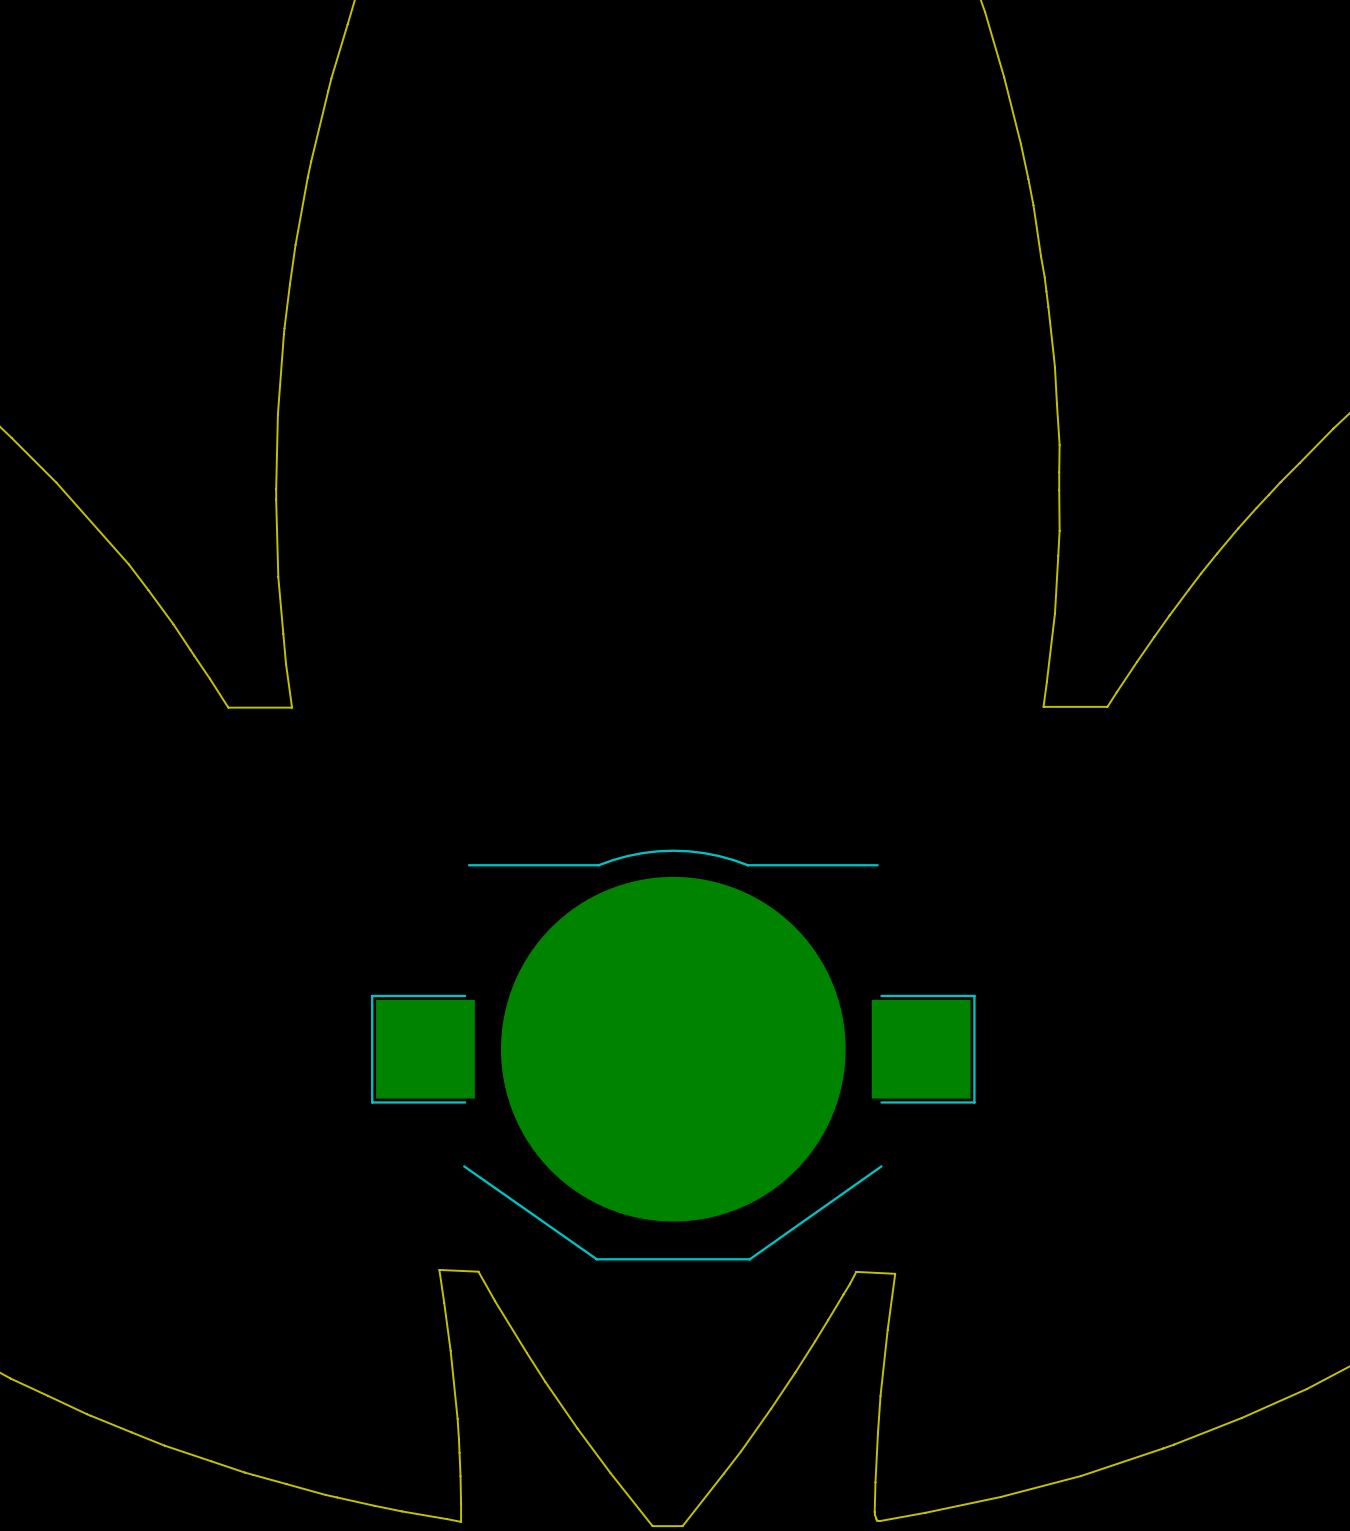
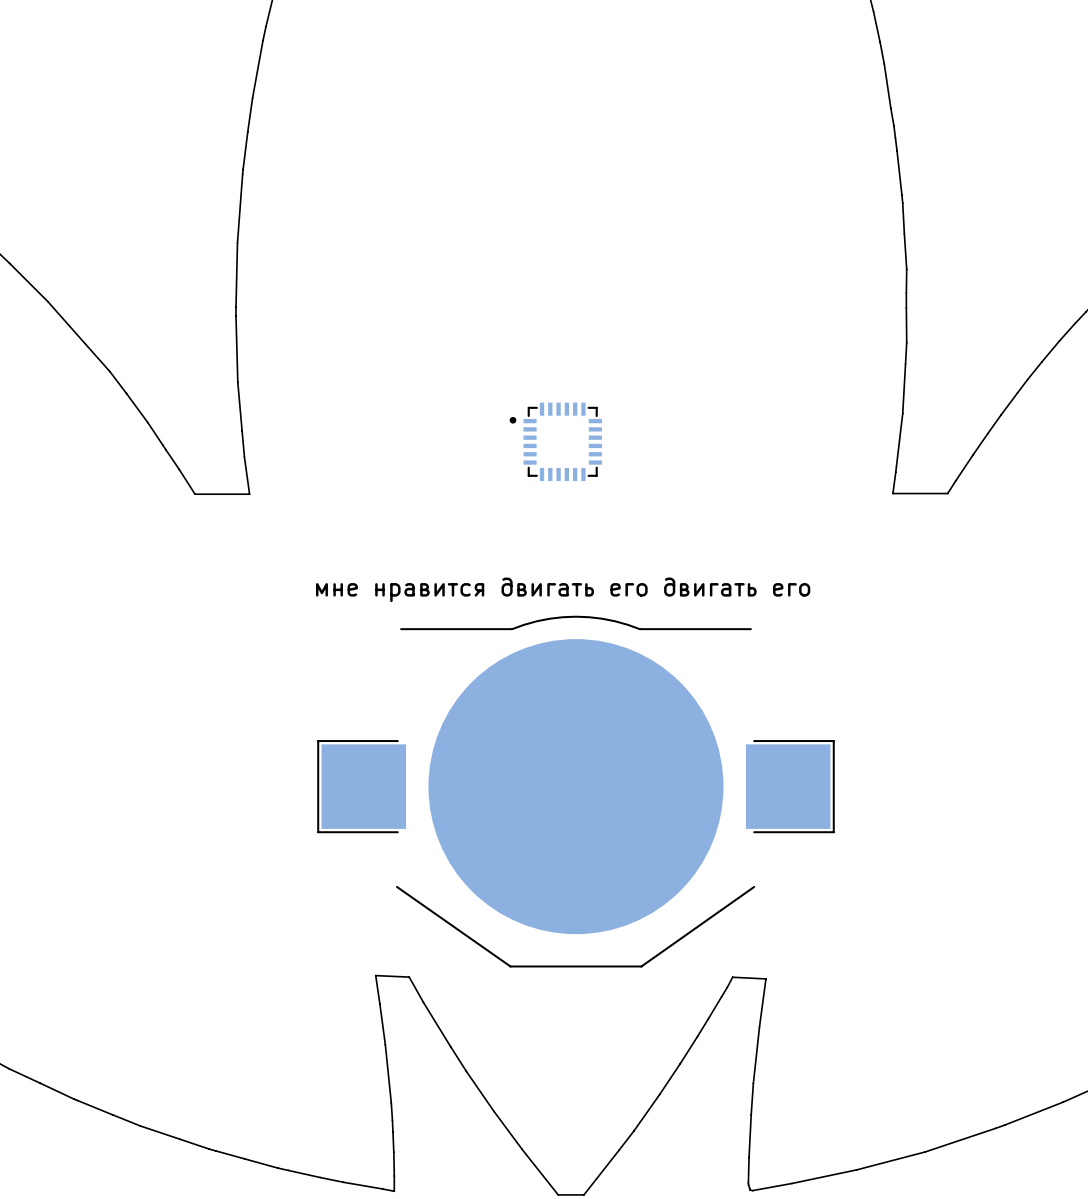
part: none -> (555, 441)
text: none -> мне нравится двигать его двигать его (563, 589)

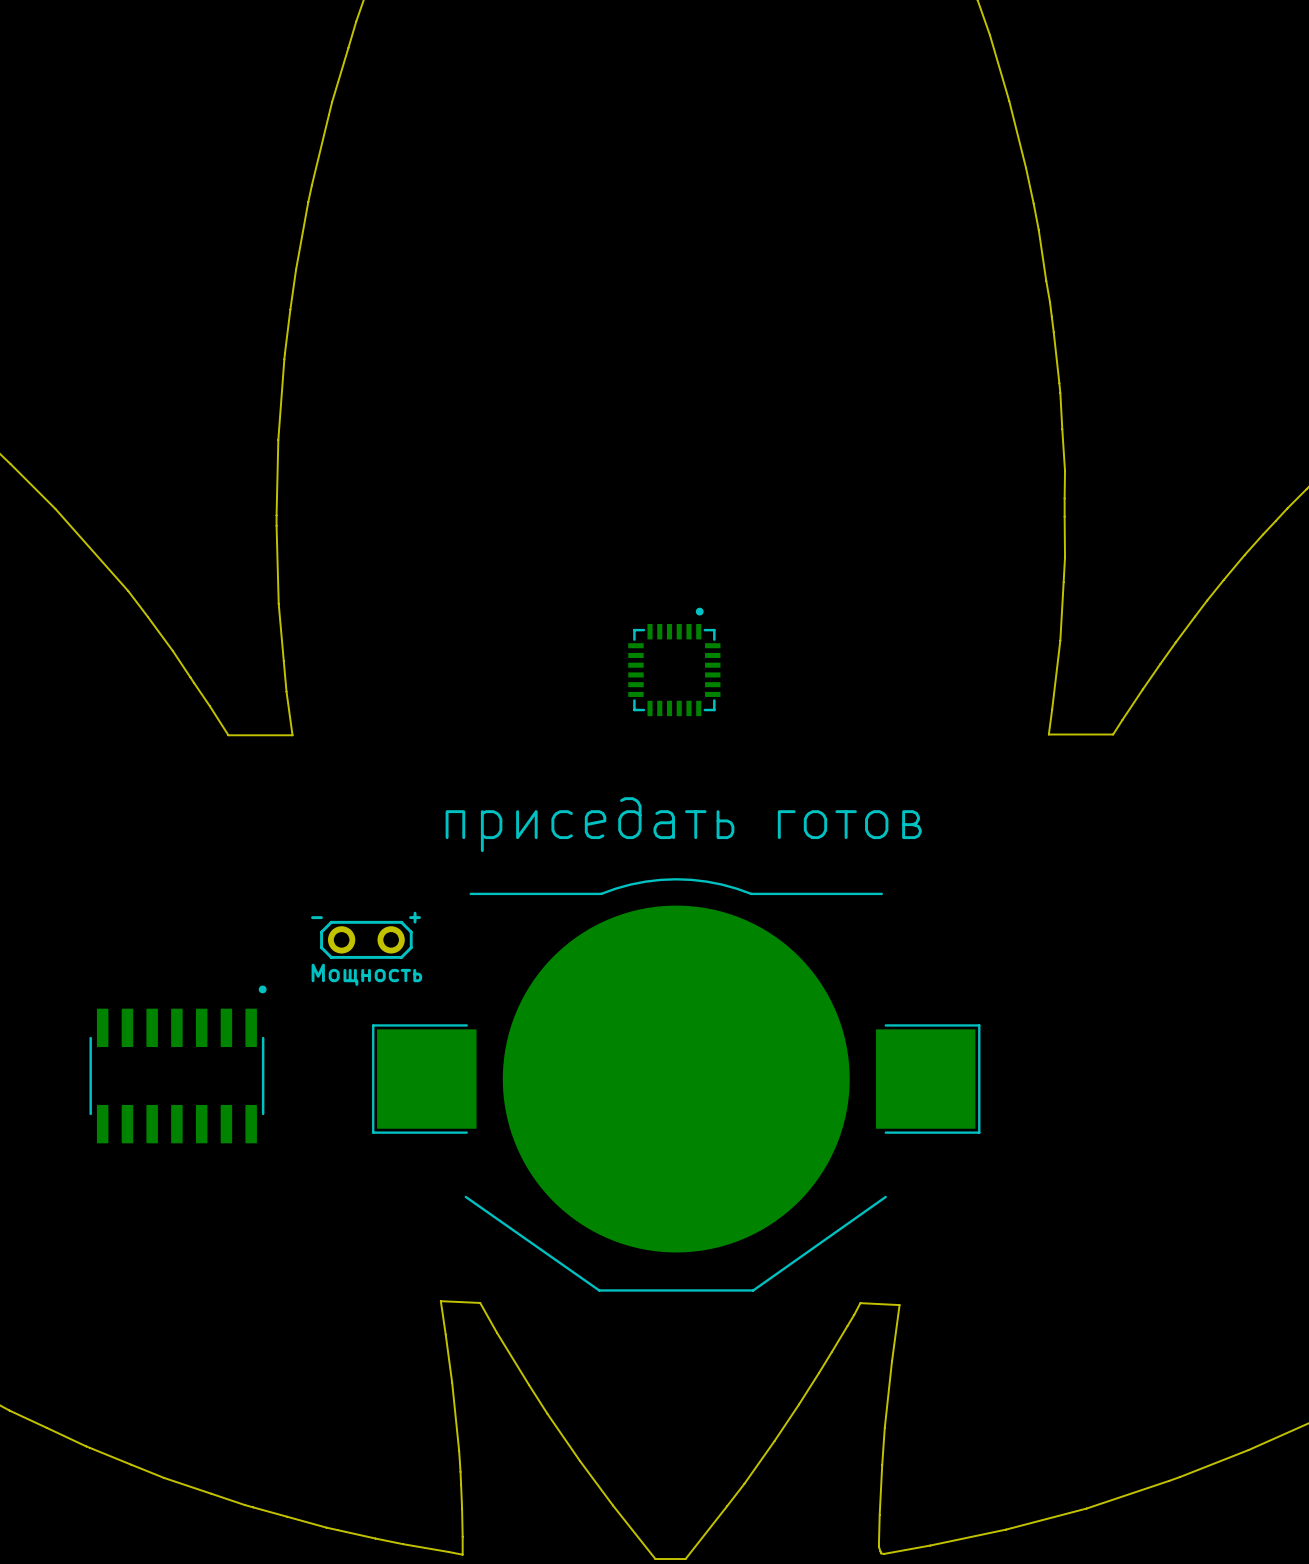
part rotation: 0° (555, 441) -> 90° clockwise (674, 661)
text: none -> приседать готов (683, 824)
text: мне нравится двигать его двигать его (563, 589) -> none
text: none -> - (316, 917)
text: none -> + (415, 917)
part: none -> (366, 939)
text: none -> Мощность (366, 974)
part: none -> (177, 1064)

